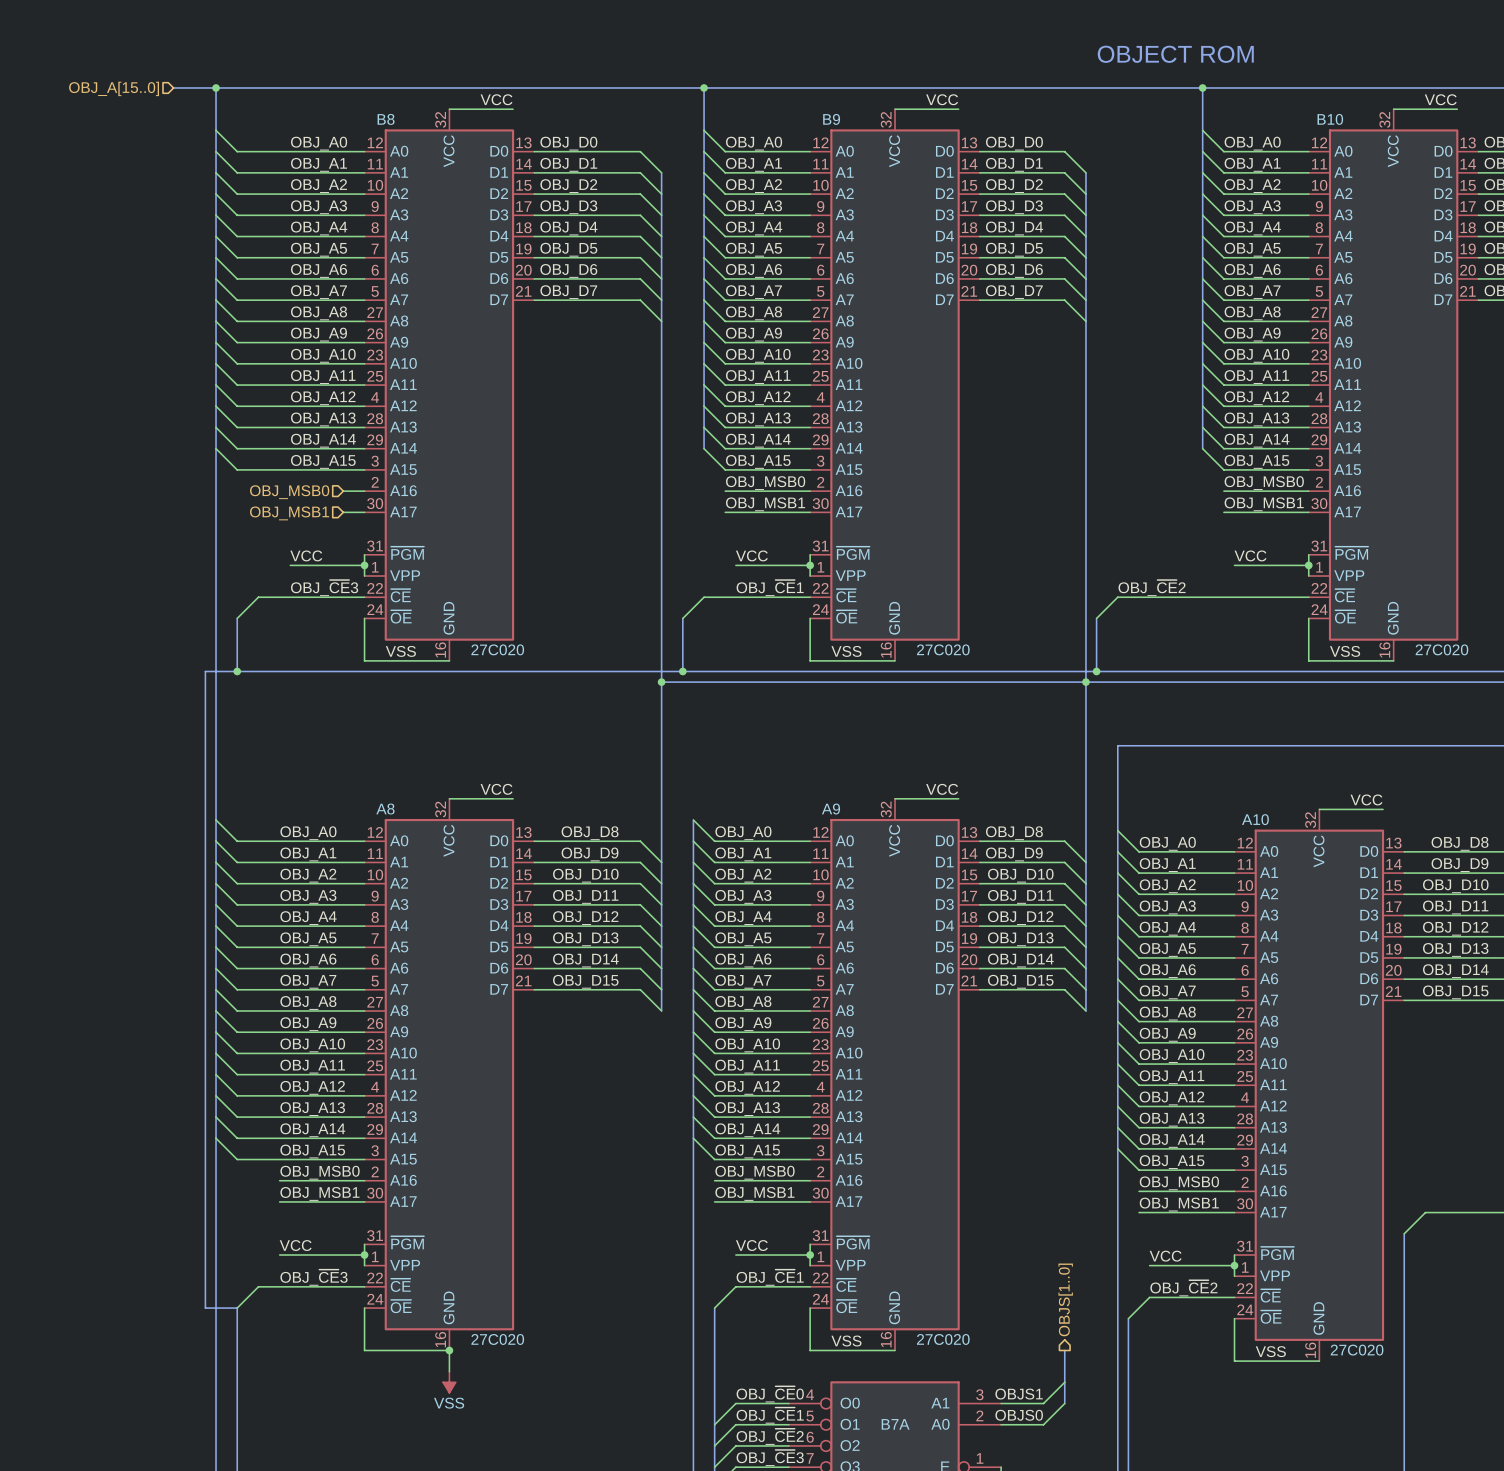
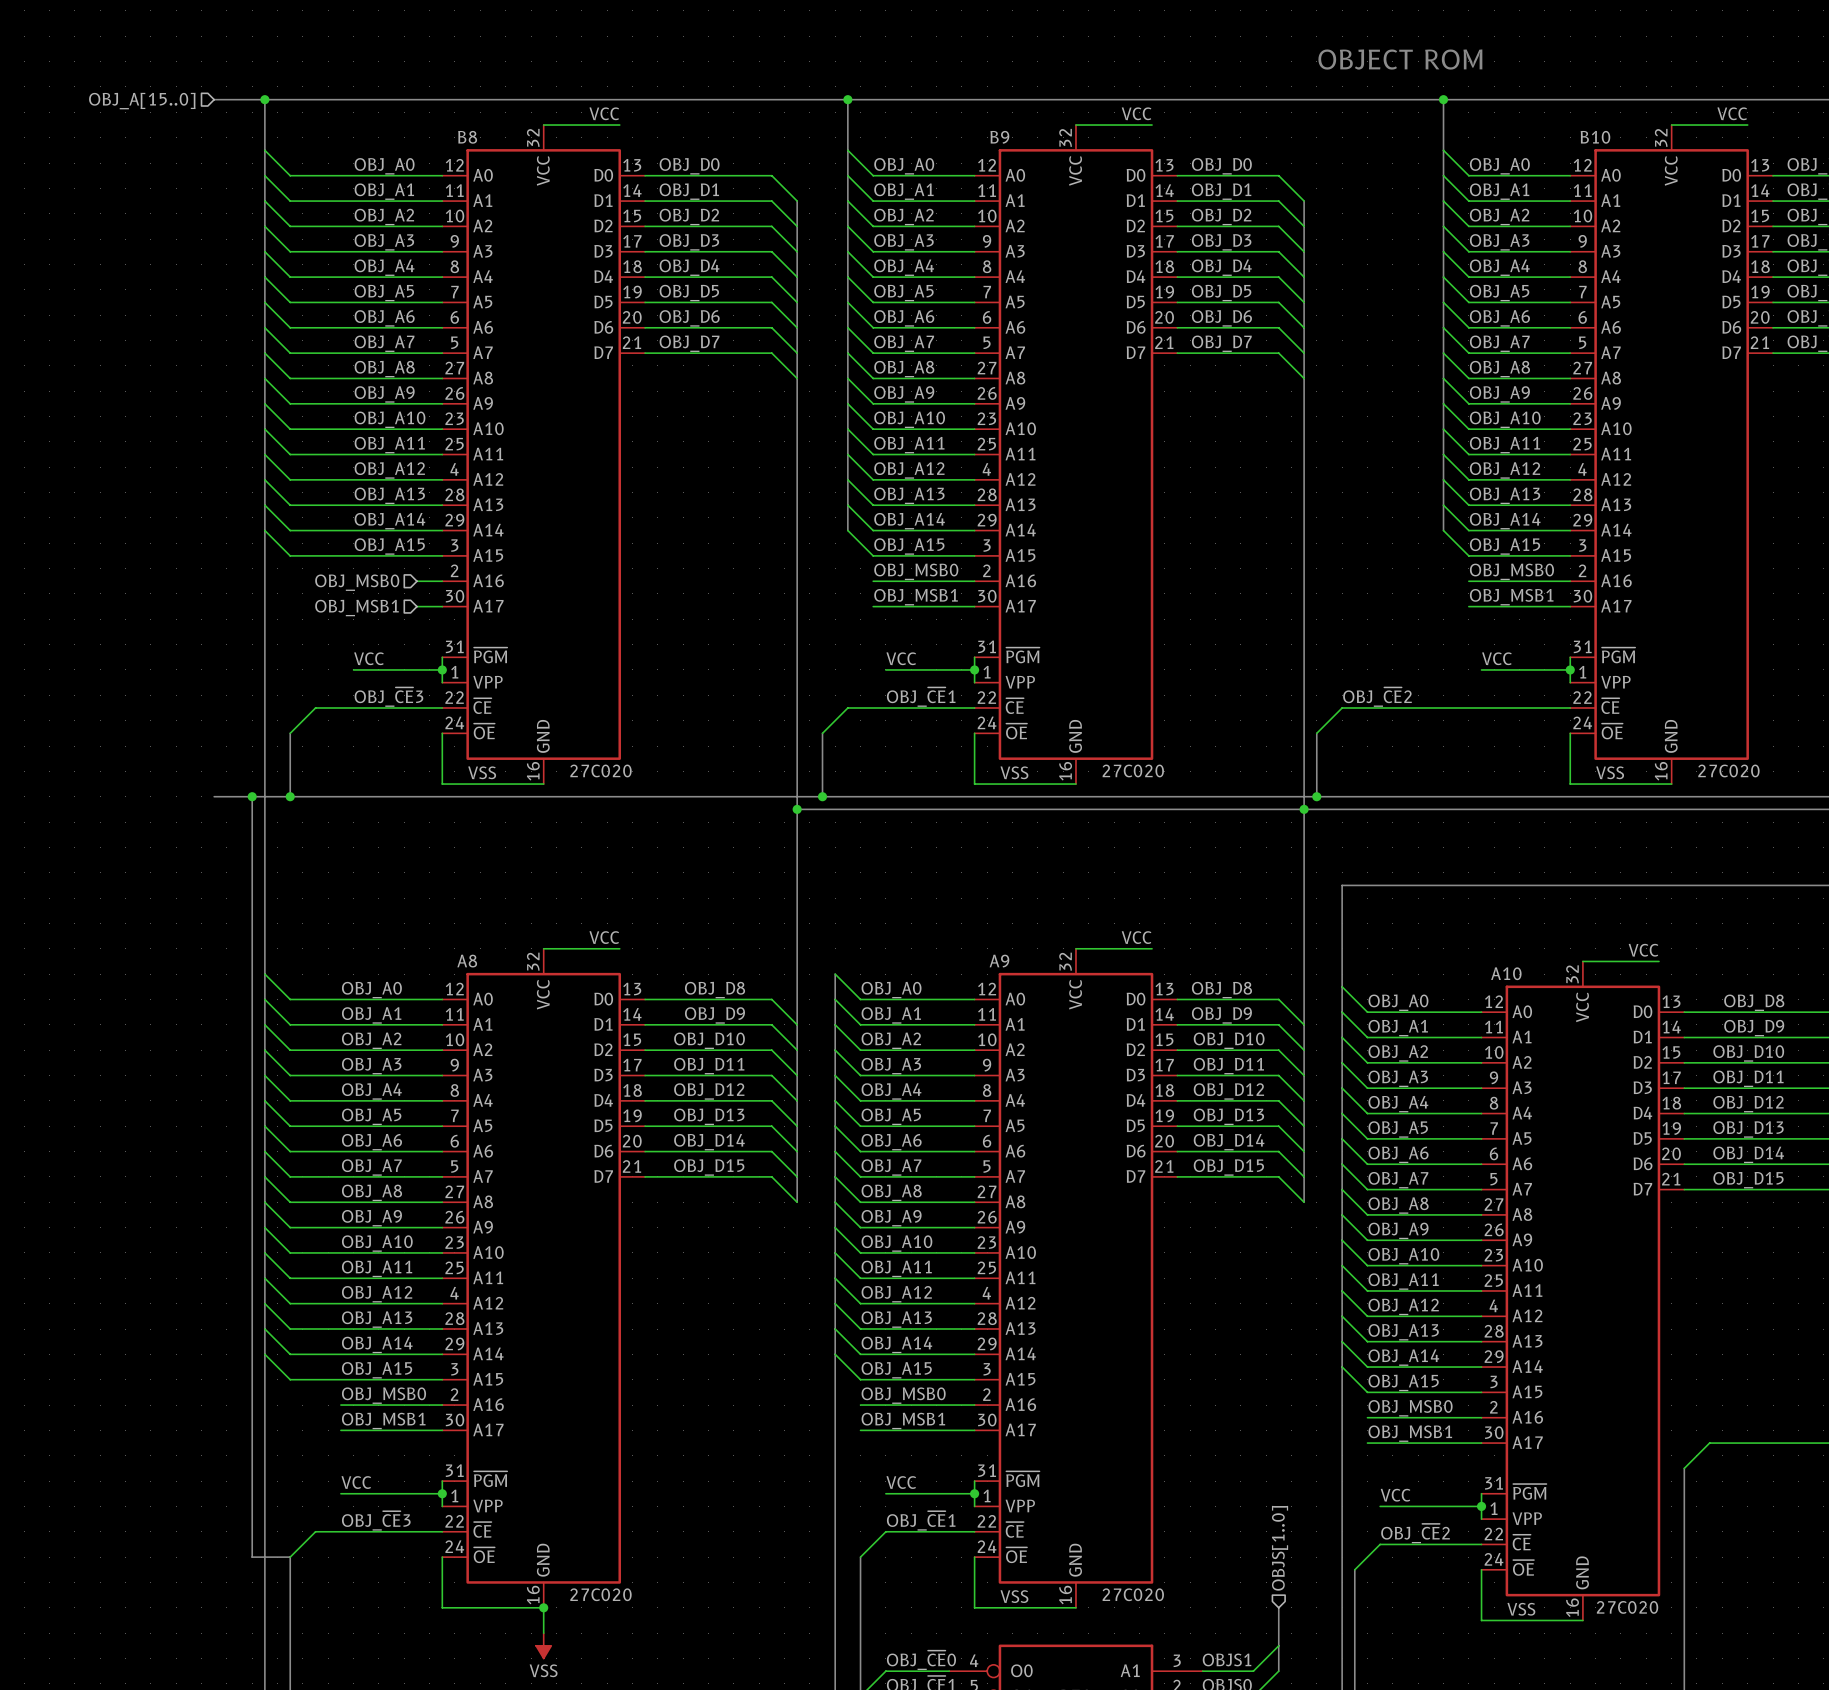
bus: none -> (214, 796) (252, 796)
junction: none -> (252, 796)
hierarchical label shape: output (1065, 1299) -> input (1280, 1548)

